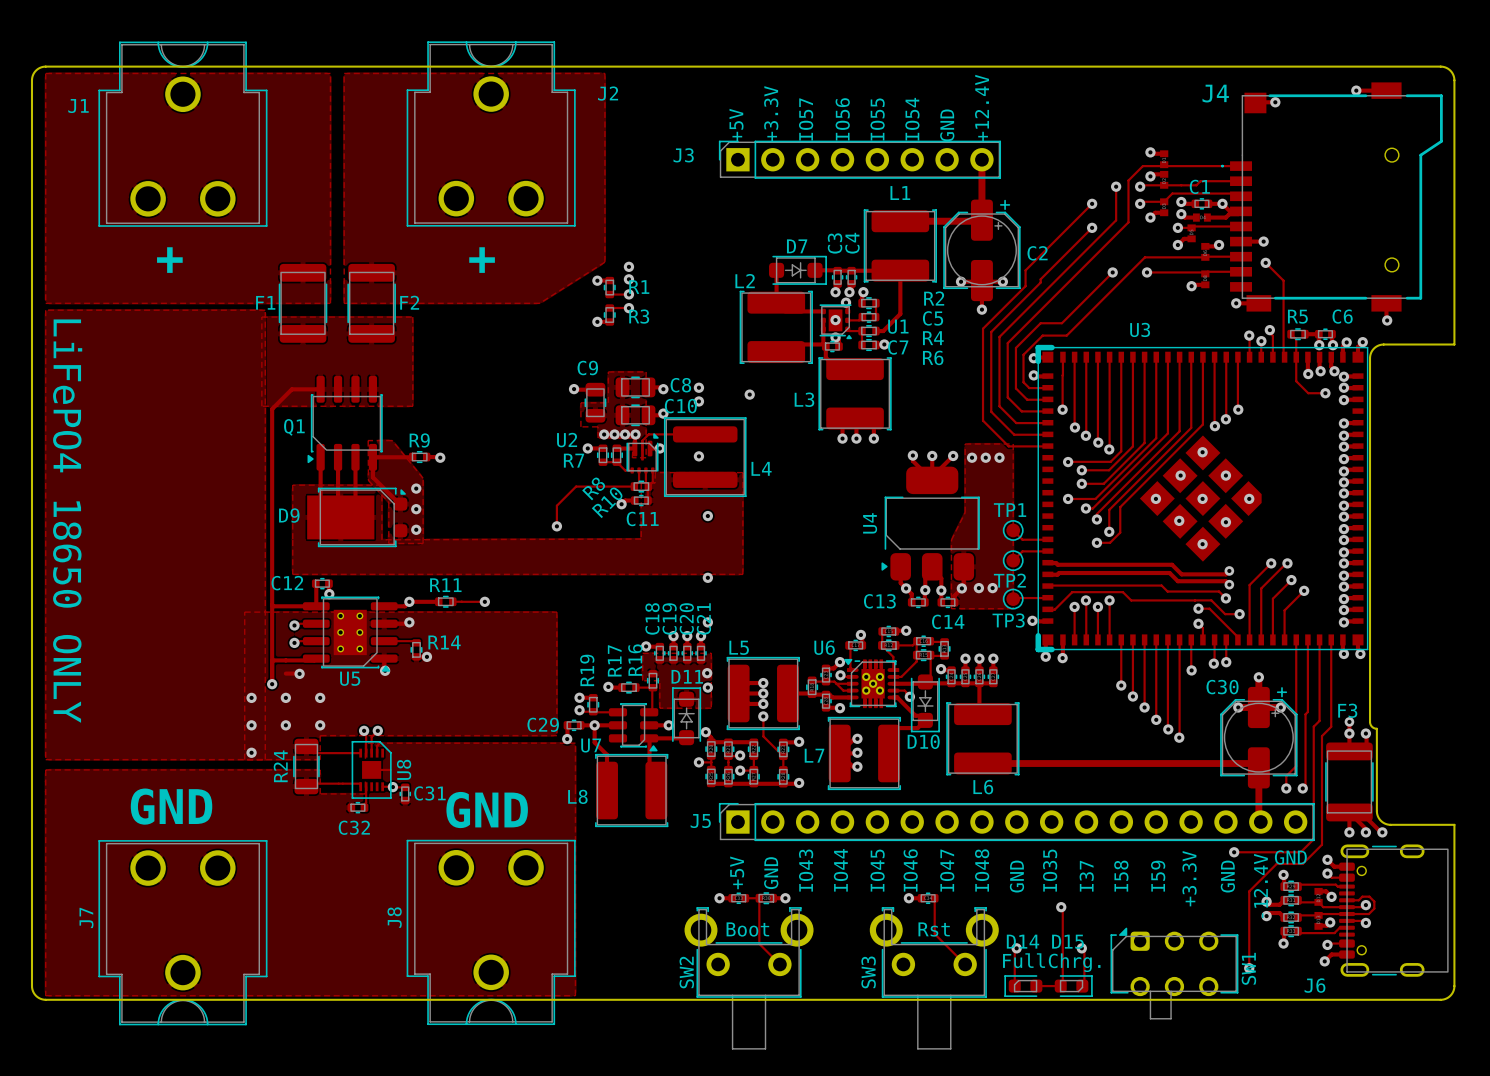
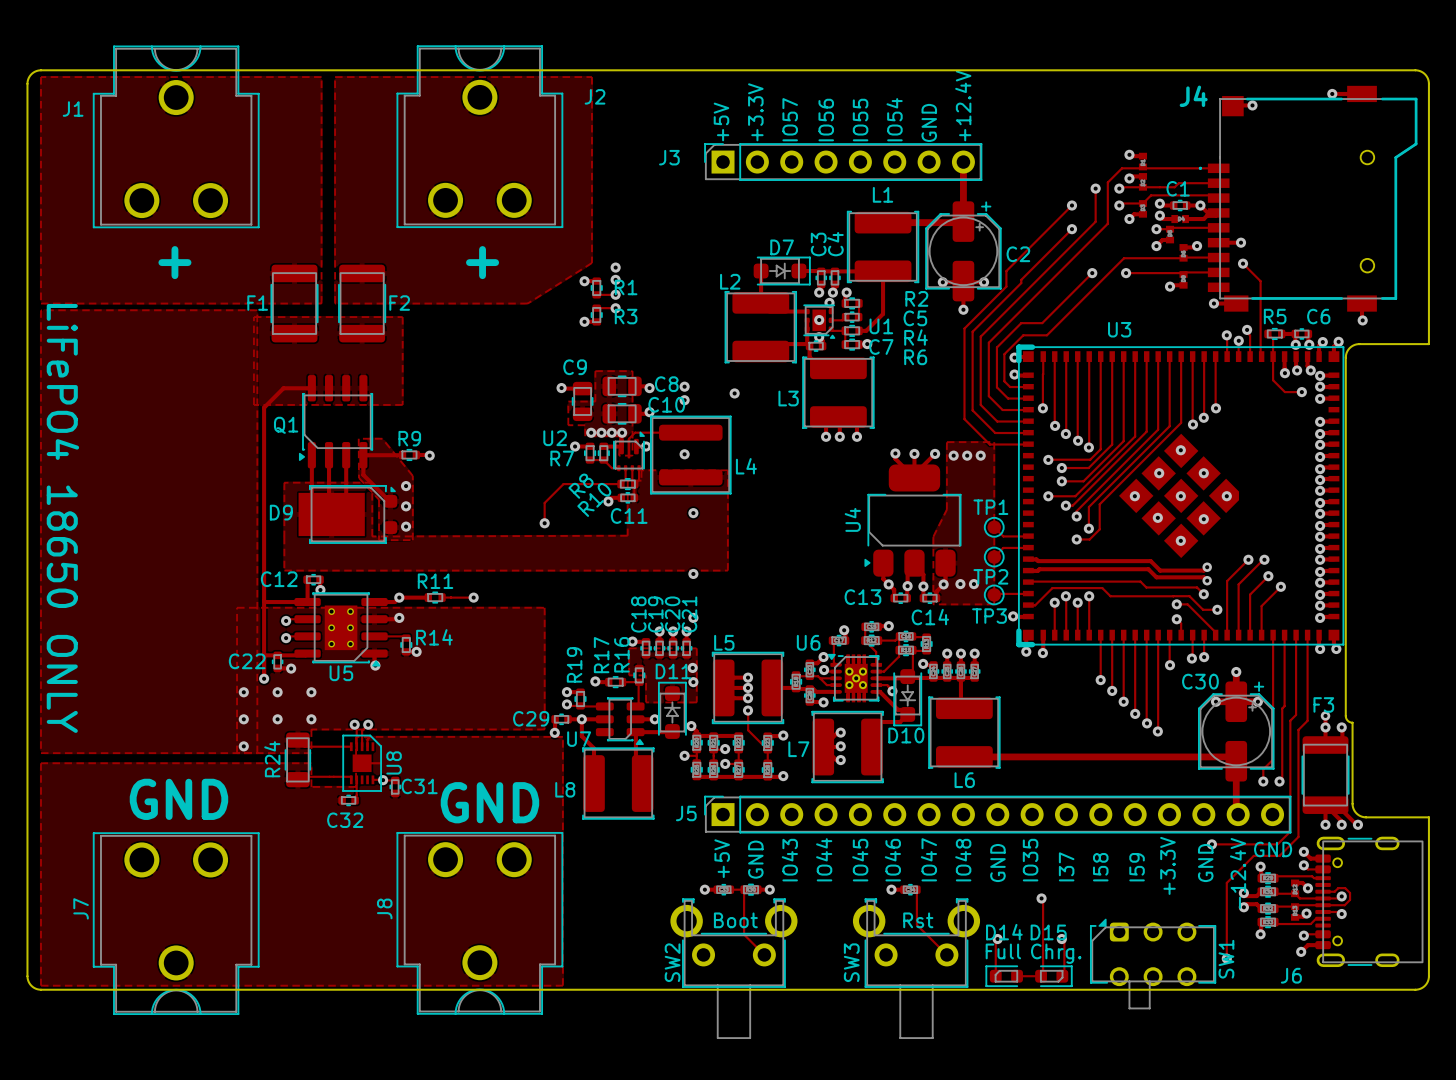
C22: none -> (277, 661)

